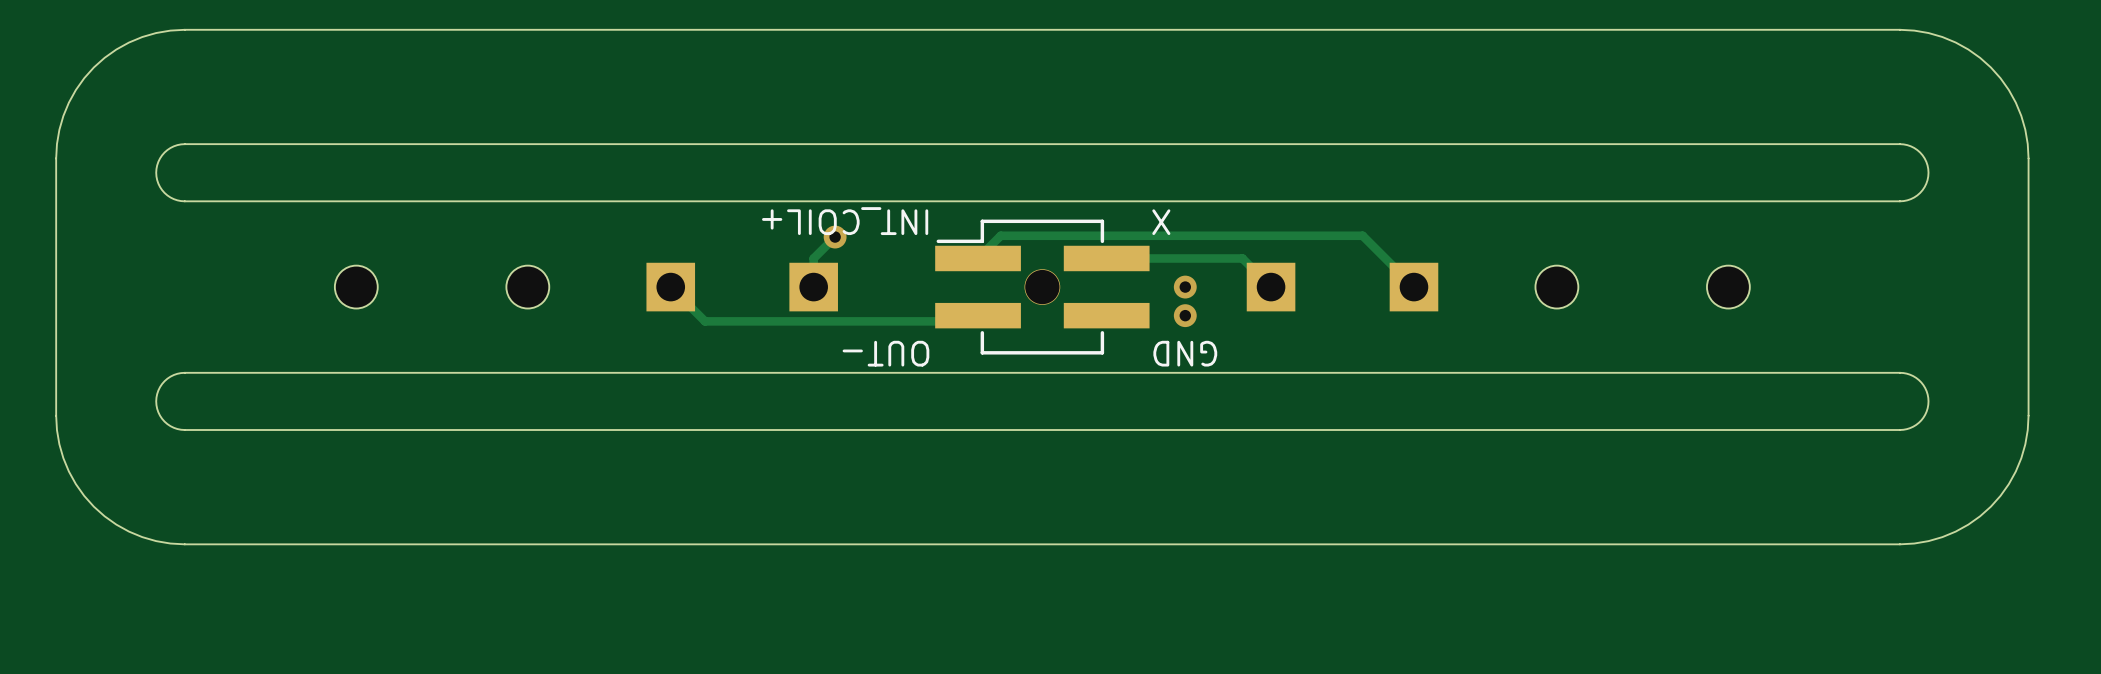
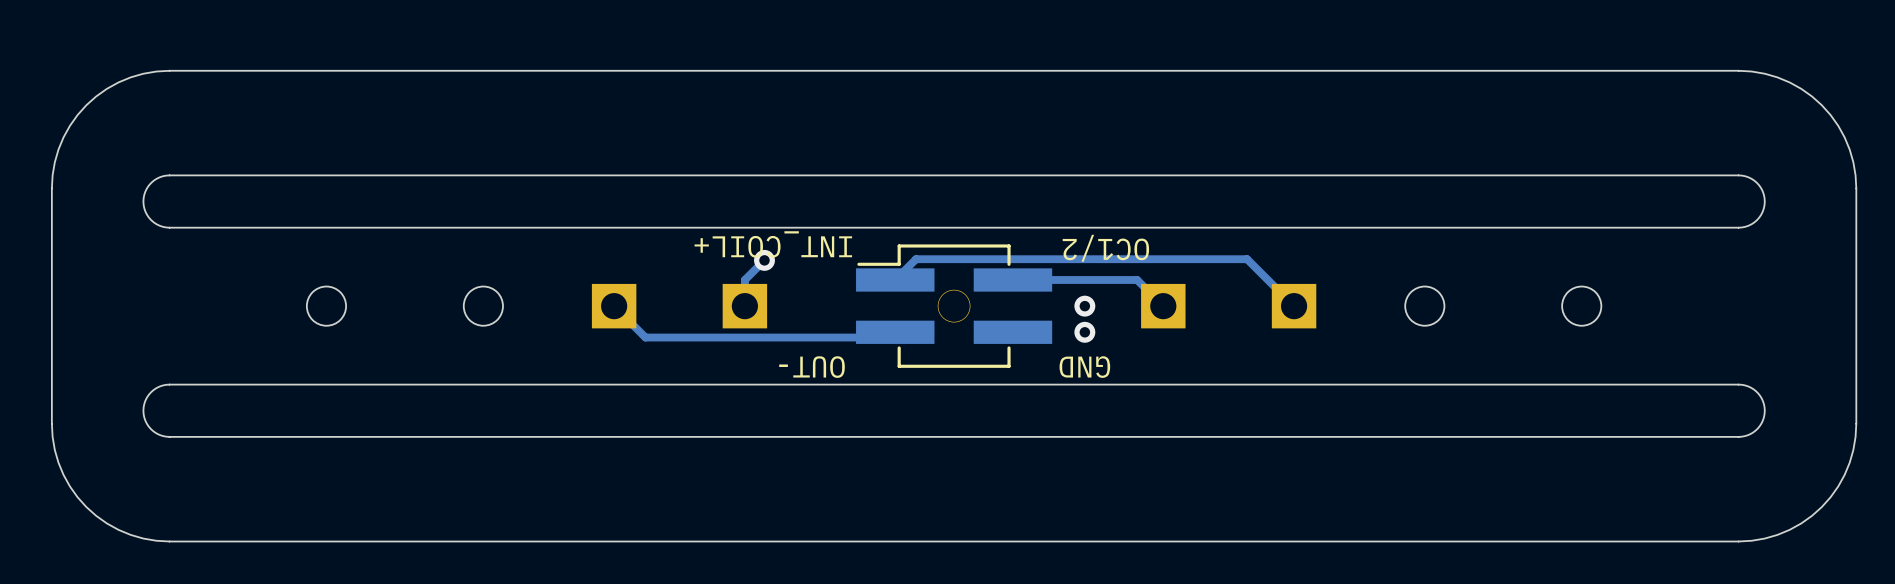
text: X (1161, 222) -> none
text: none -> OC1/2 (1105, 248)

